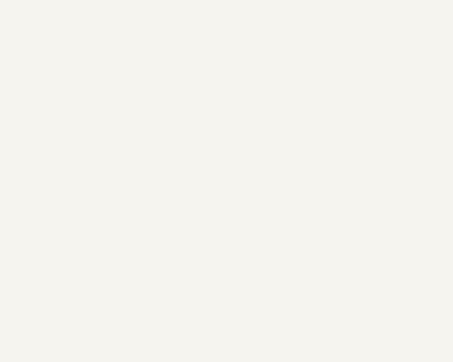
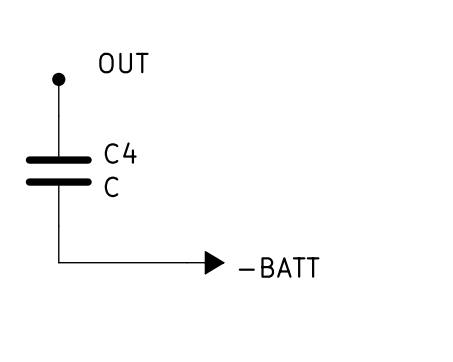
label: none -> OUT (123, 63)
wire: none -> (58, 79) (58, 116)
junction: none -> (58, 79)
C4: none -> C (58, 171)
wire: none -> (58, 226) (58, 262) (187, 262)
power symbol: none -> -BATT (205, 262)

